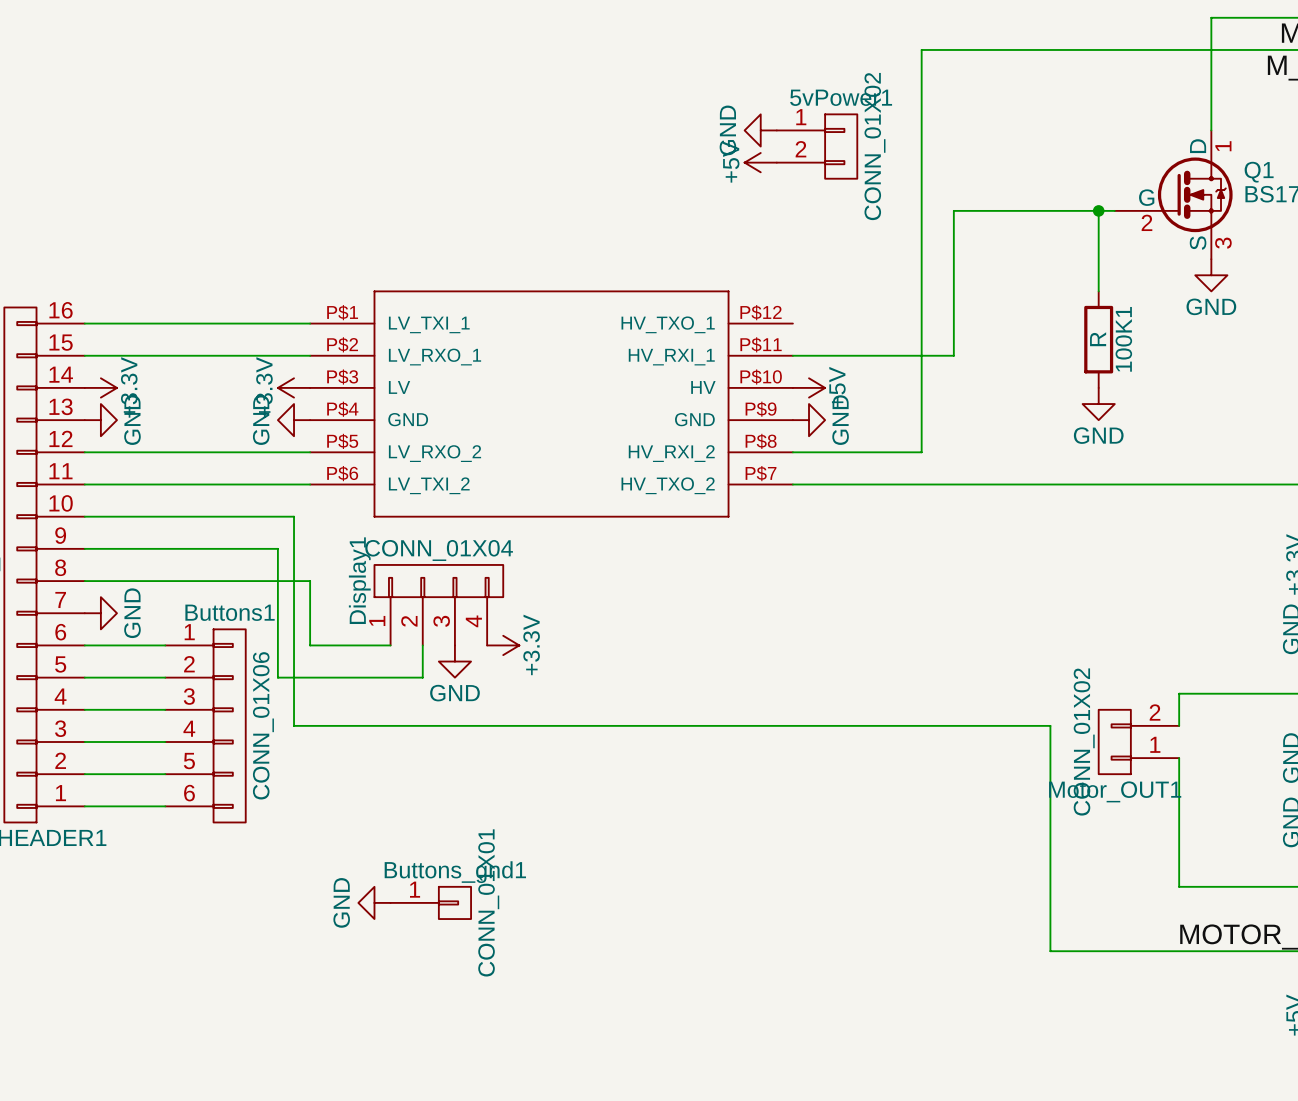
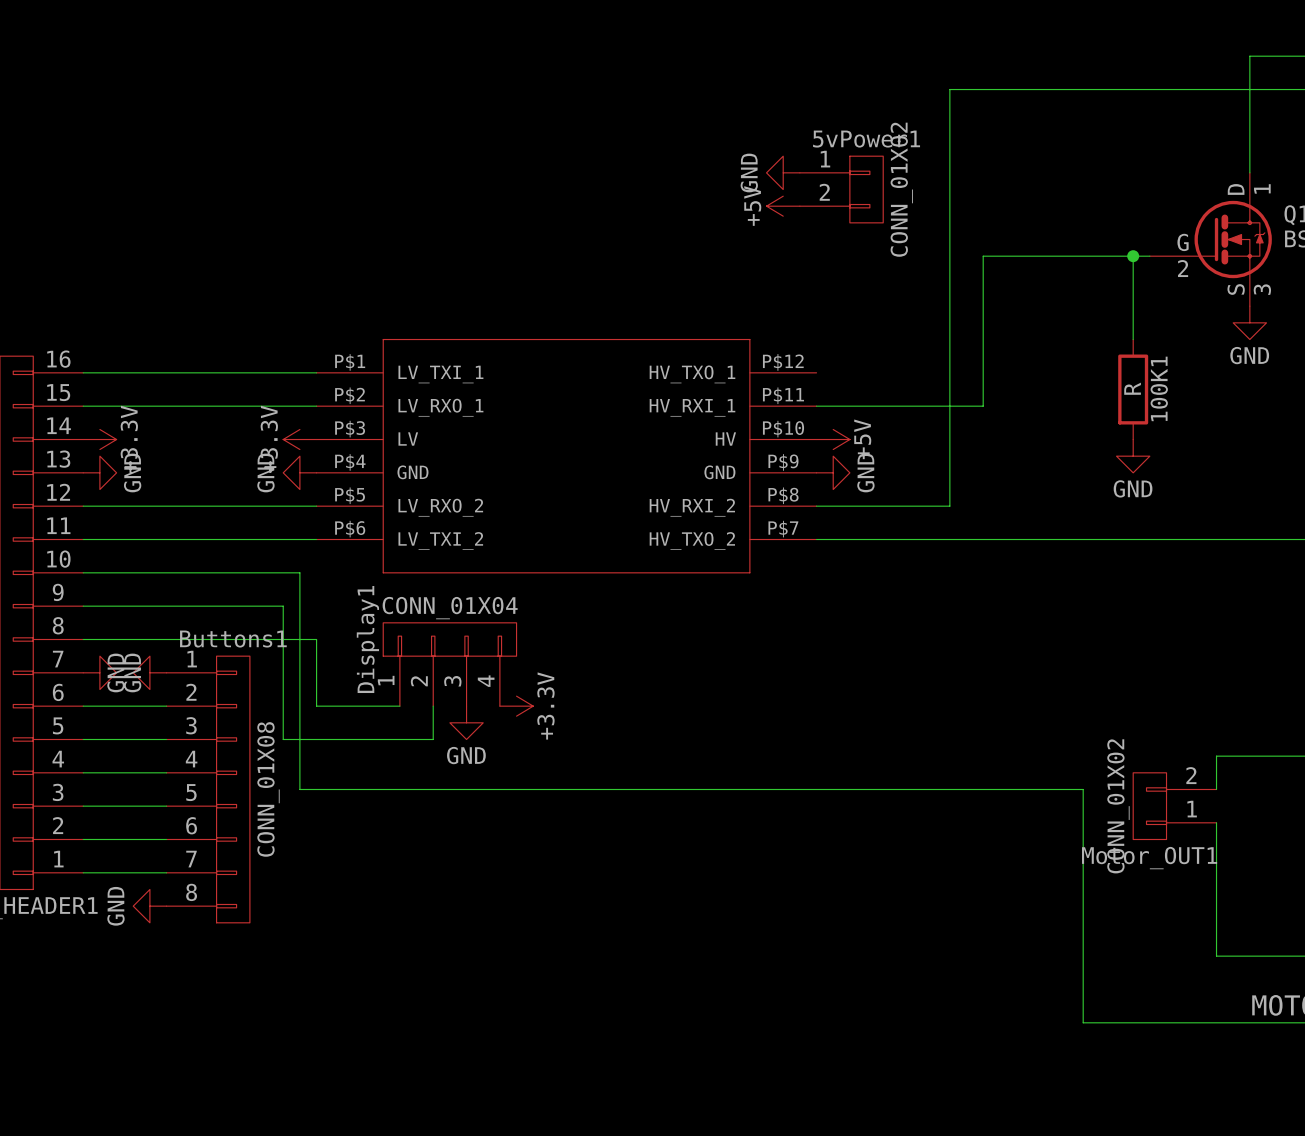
Buttons1 name position: Buttons1 (230, 612) -> Buttons1 (233, 639)
power symbol: none -> GND (149, 672)
Buttons1 symbol: [165, 629, 246, 823] -> [166, 656, 250, 923]
Buttons1 value: CONN_01X06 (263, 725) -> CONN_01X08 (268, 789)
power symbol: none -> GND (149, 906)
power symbol: GND (374, 902) -> none
Buttons_gnd1: CONN_01X01 (430, 902) -> none

